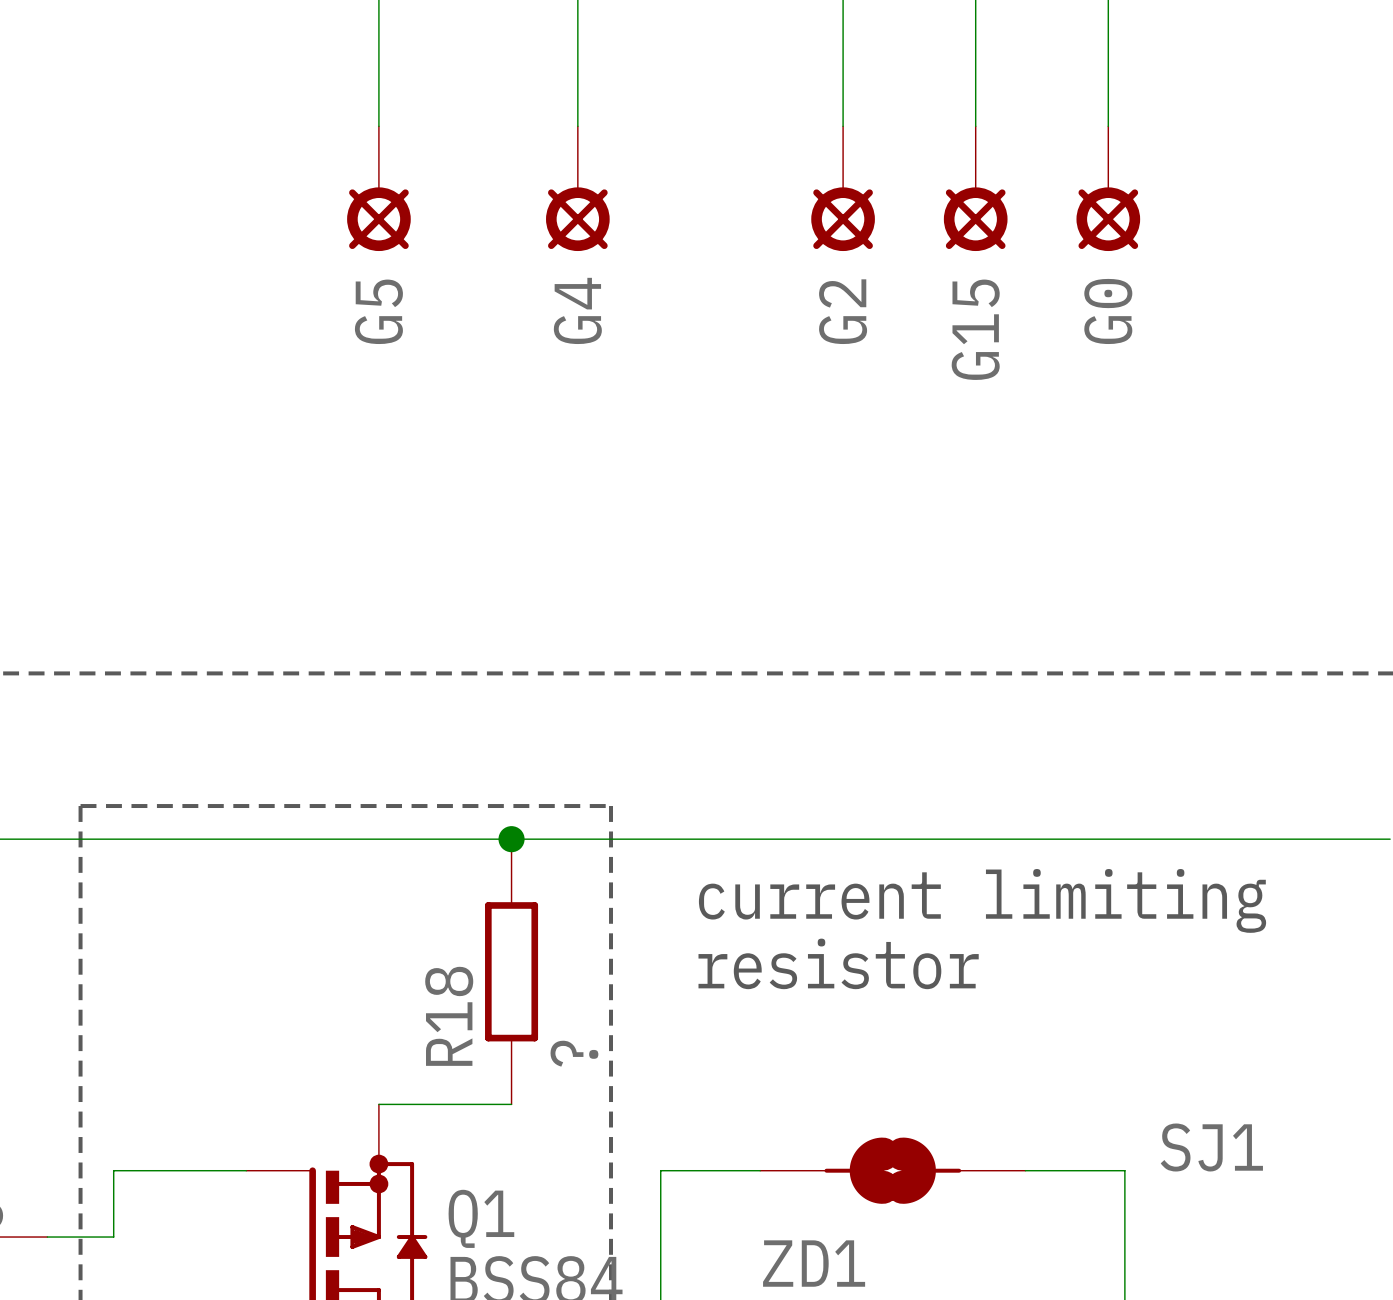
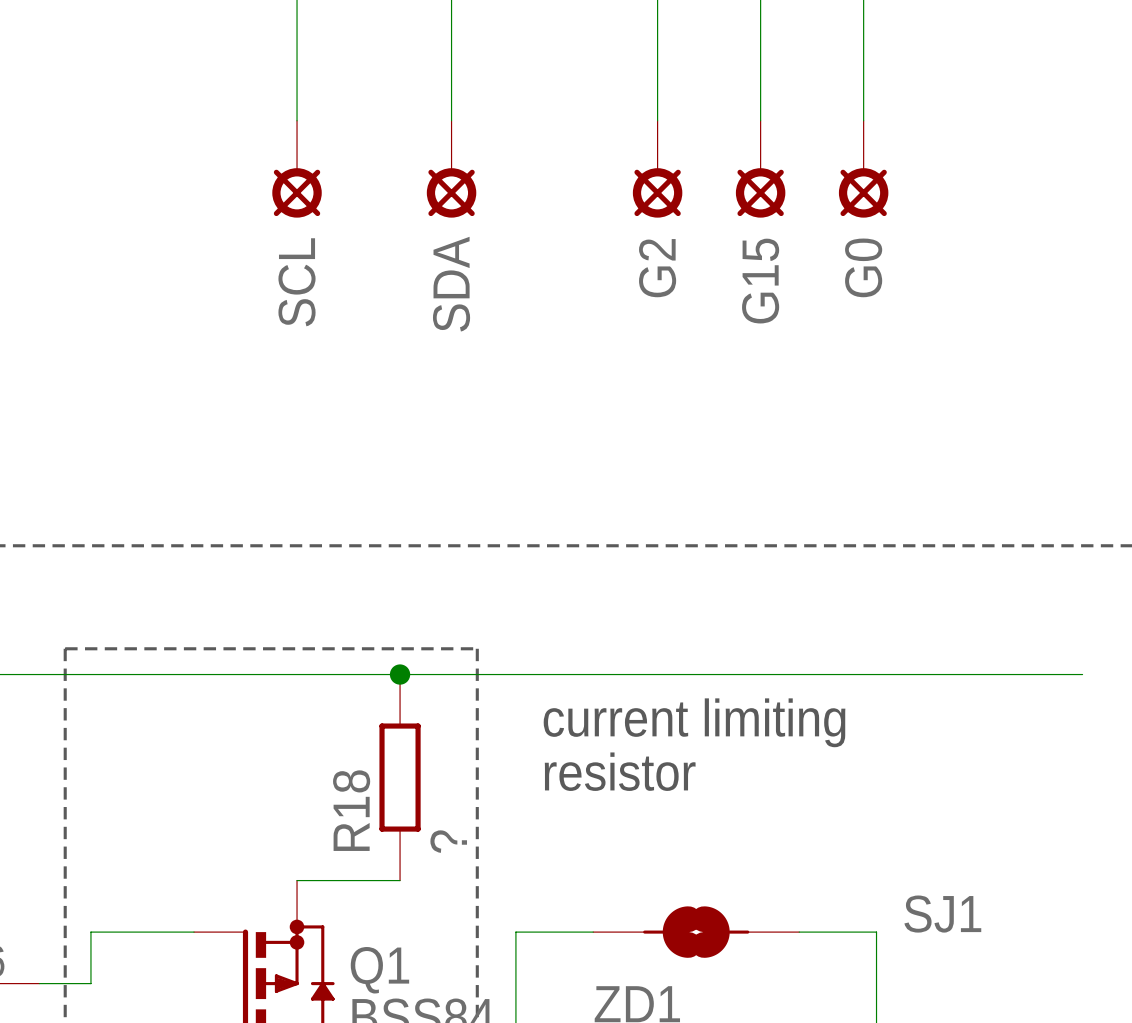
G4 name: G4 (577, 310) -> SDA (451, 284)
G5 name: G5 (378, 311) -> SCL (297, 282)

